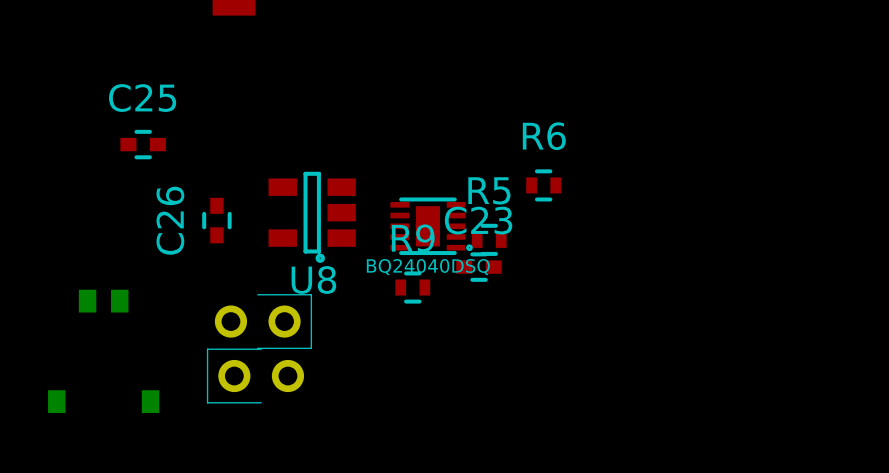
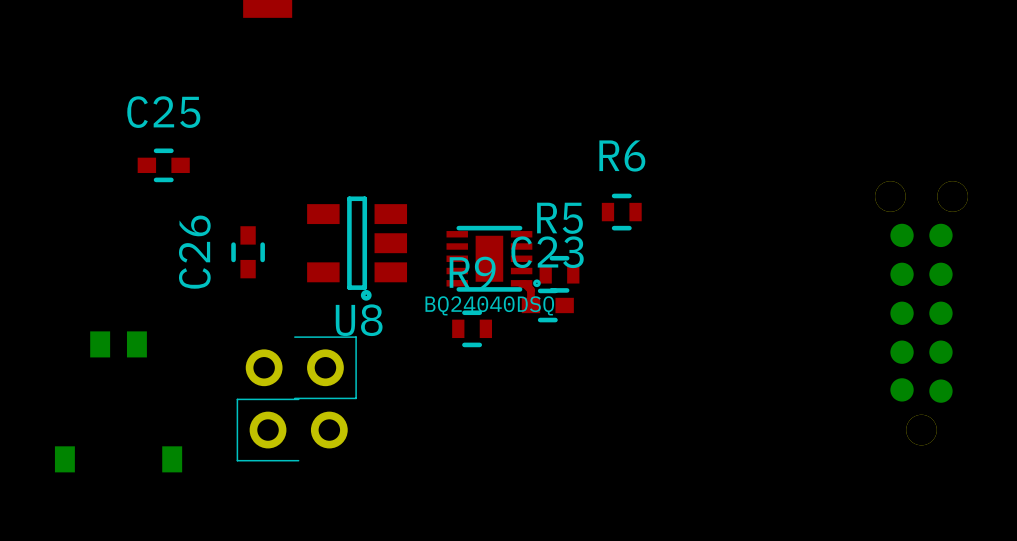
top track: none -> (521, 284) (525, 284) (530, 290) (530, 305)
part: none -> (921, 313)

